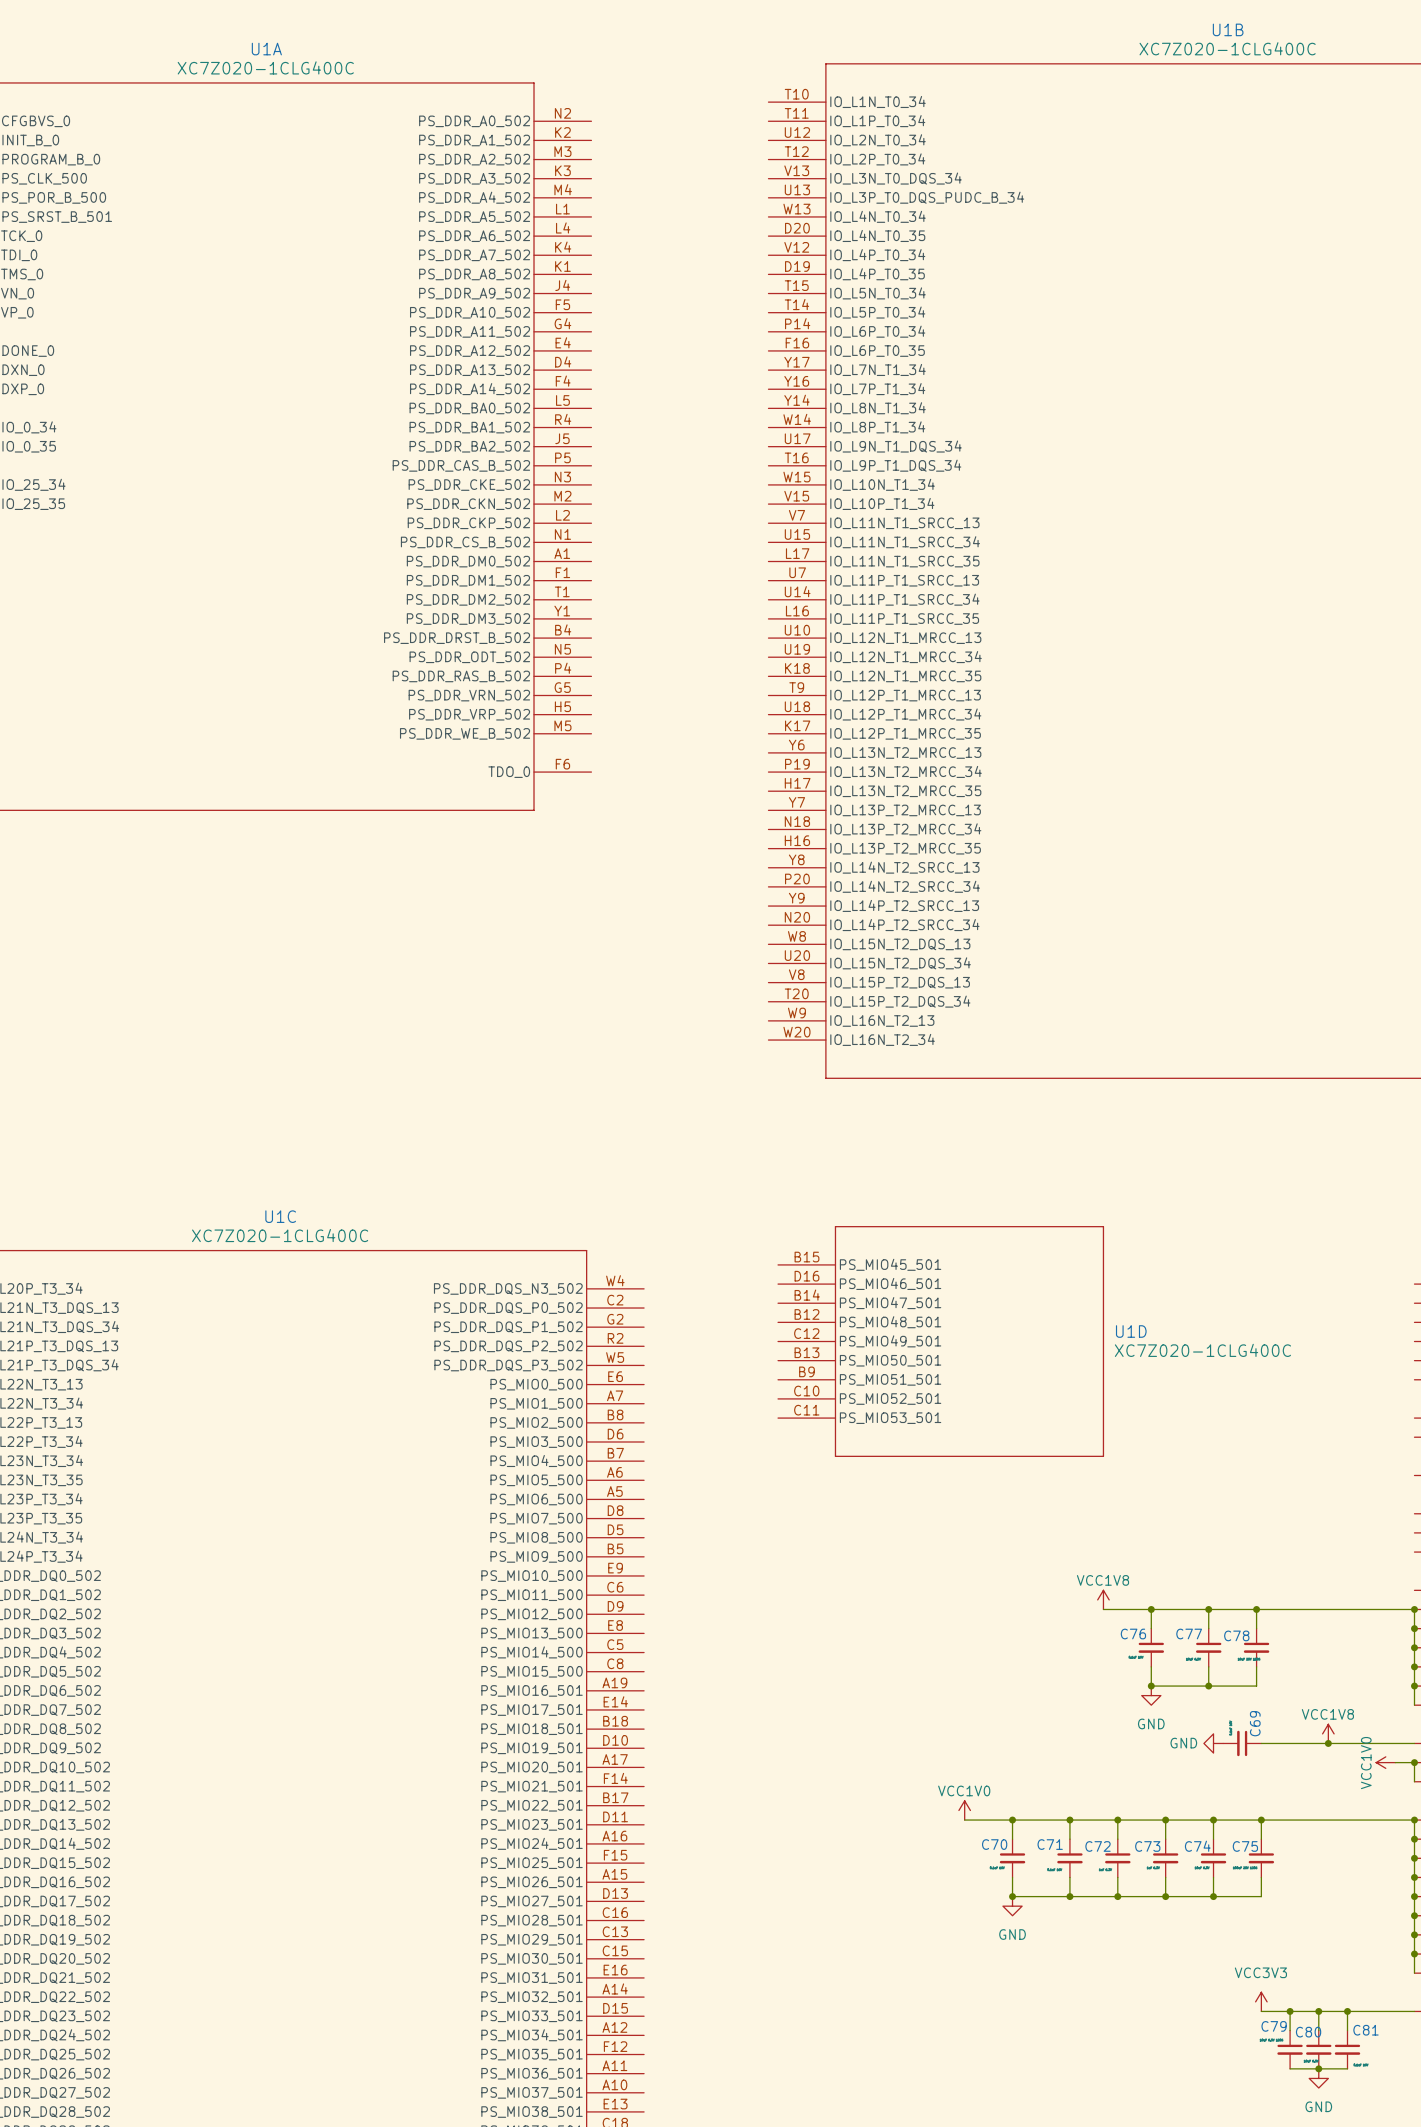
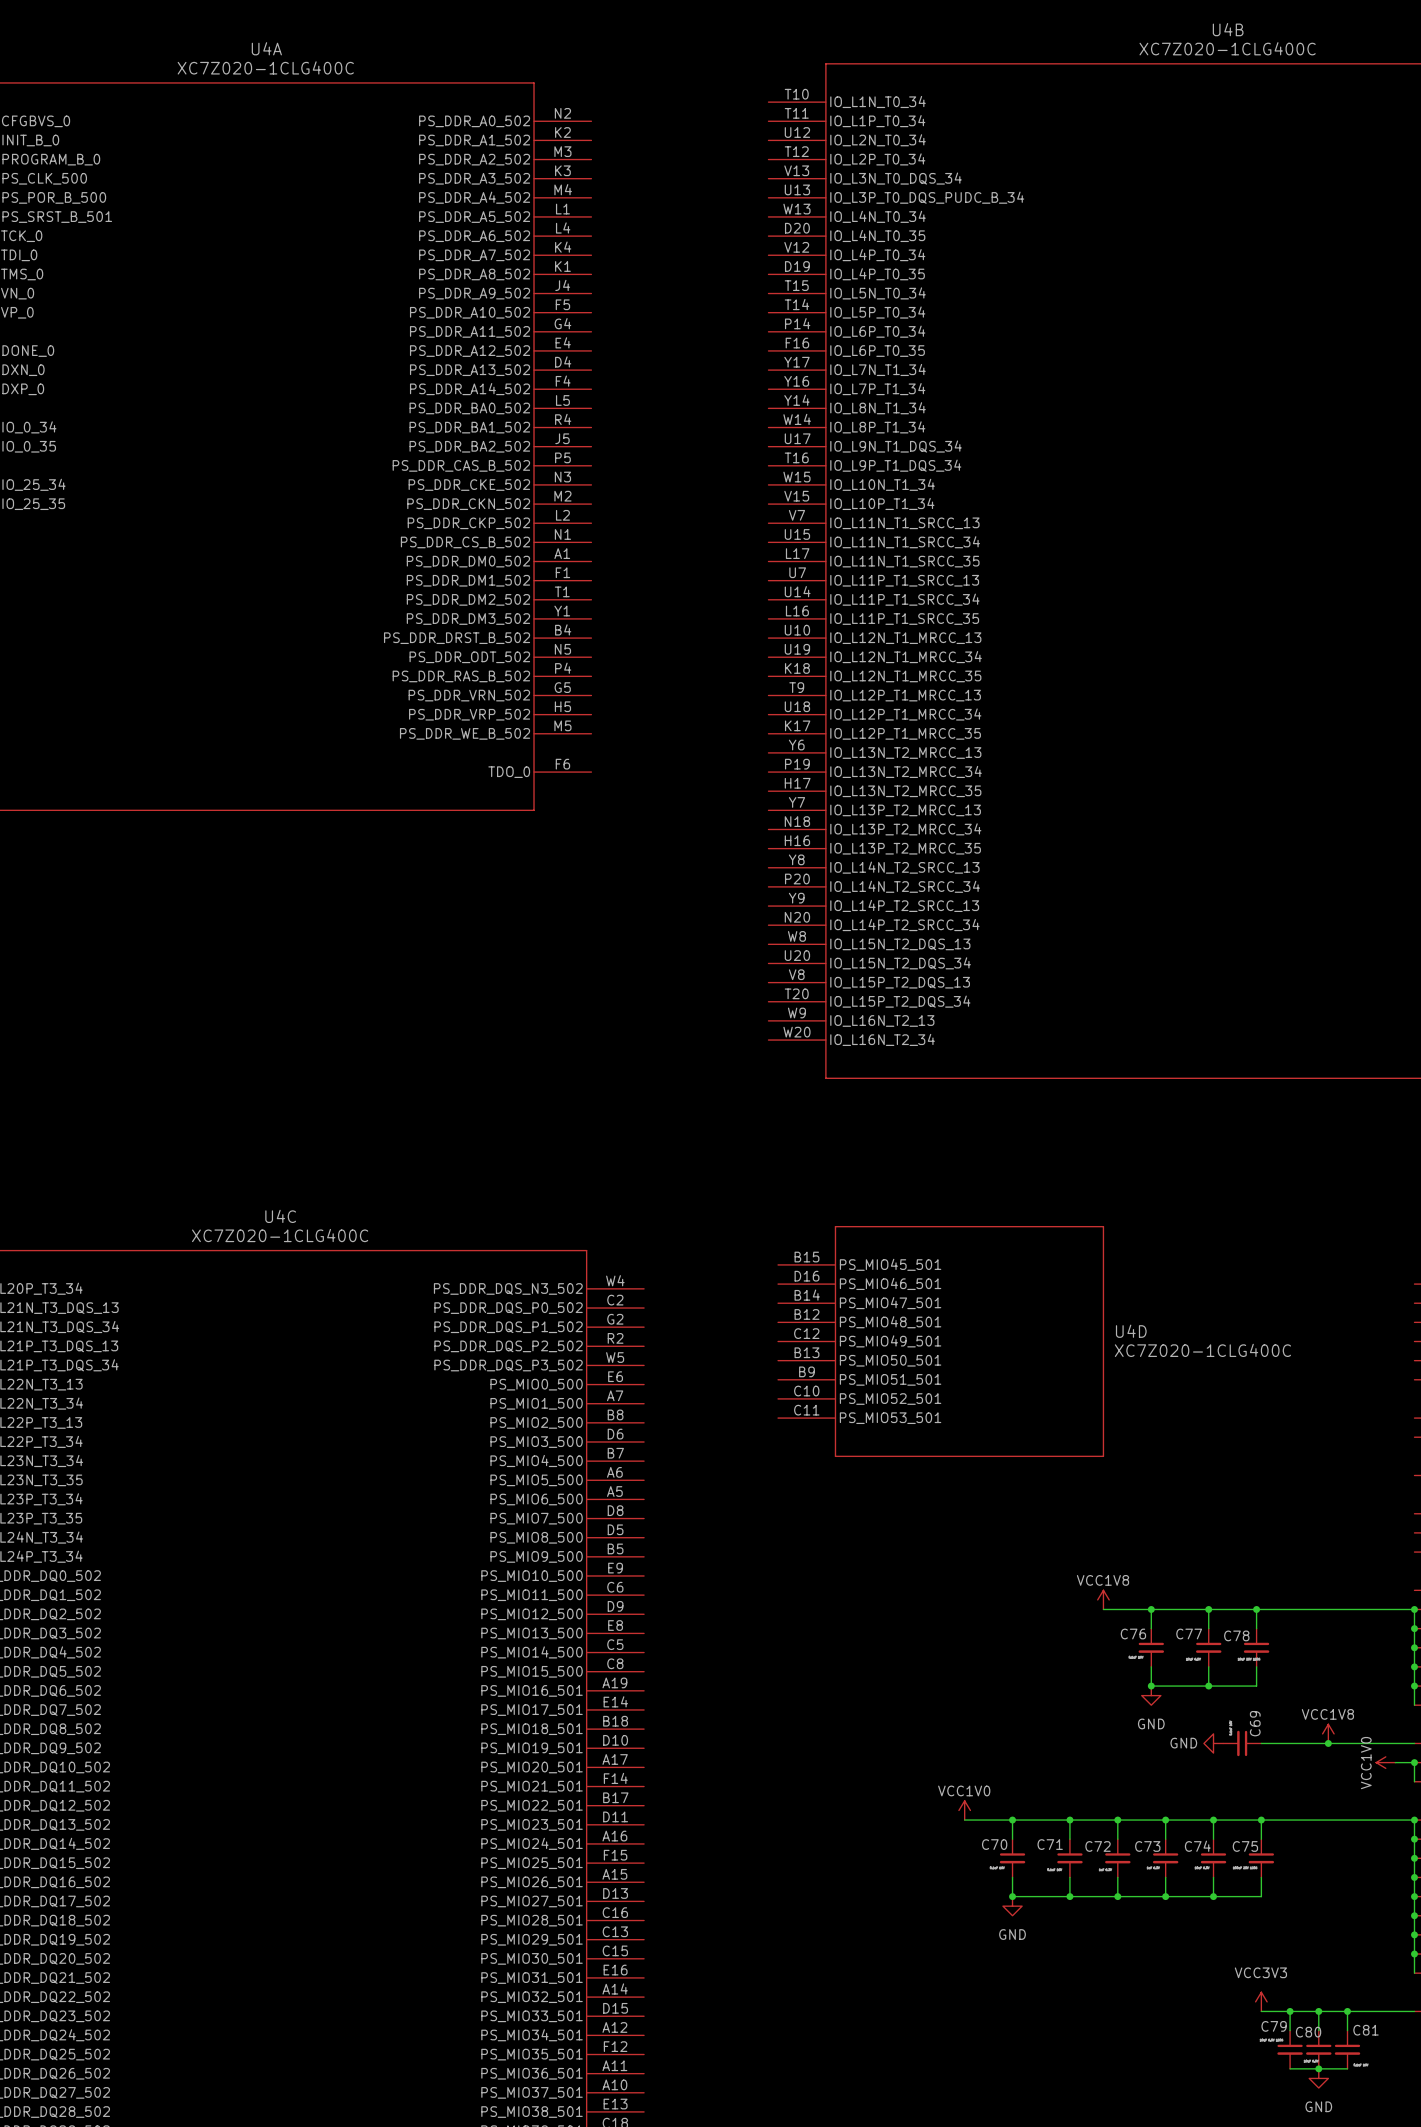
U1B name: U1B (1228, 29) -> U4B (1228, 29)
U1A name: U1A (266, 49) -> U4A (266, 48)
U1C name: U1C (280, 1216) -> U4C (280, 1216)
U1D name: U1D (1131, 1331) -> U4D (1131, 1331)

